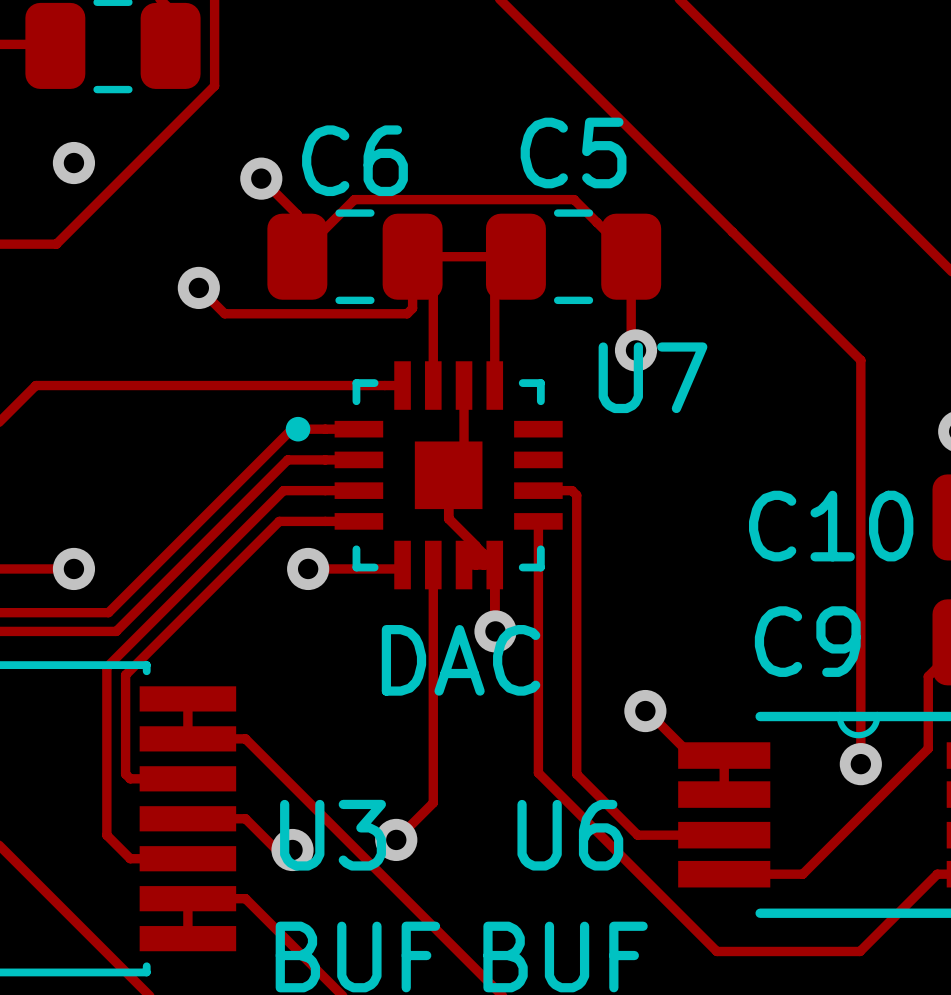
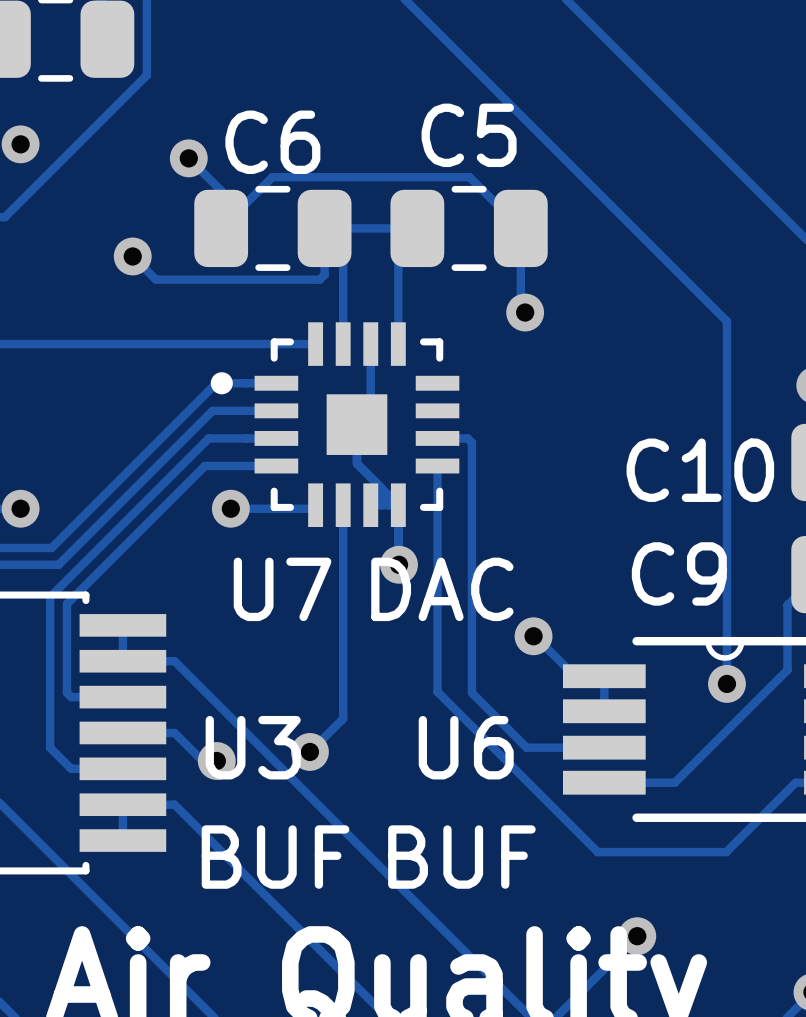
U7 name position: U7 (652, 377) -> U7 (282, 589)
U7 value position: DAC (461, 660) -> DAC (442, 589)

